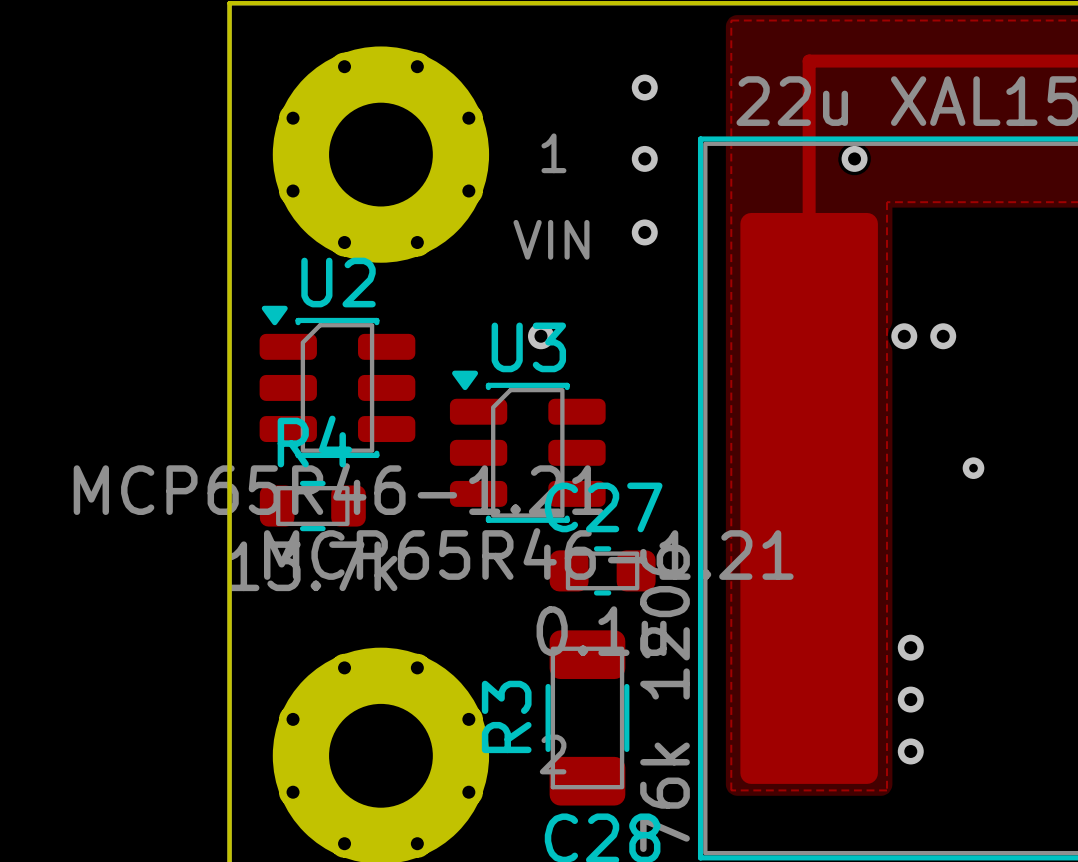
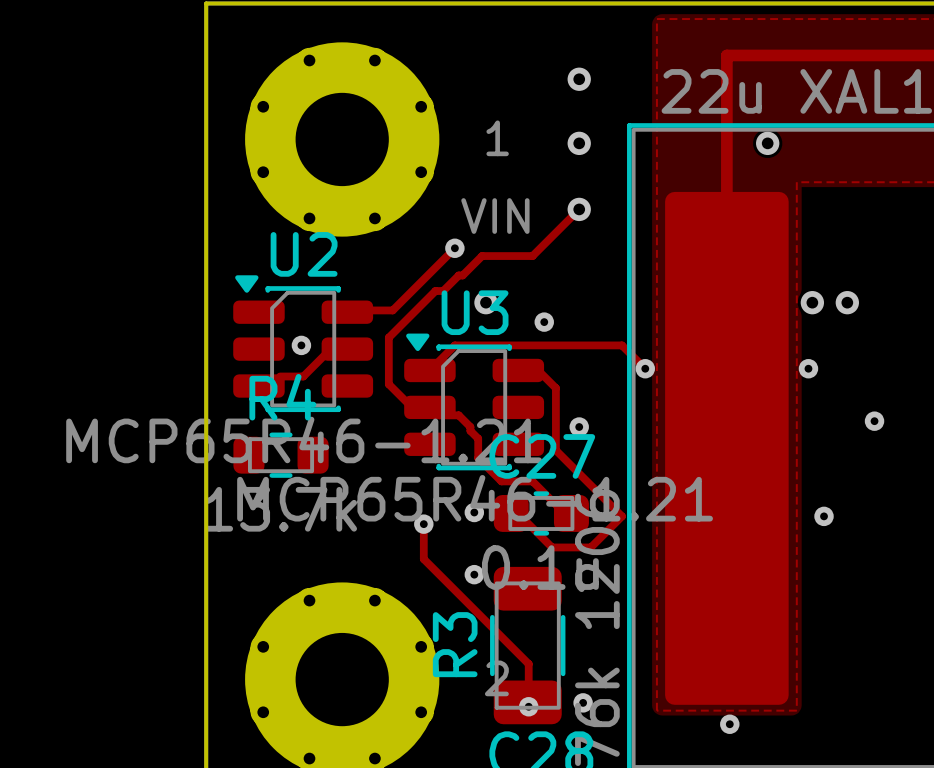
track: none -> (579, 209) (532, 256) (482, 256) (443, 291) (435, 291) (388, 337) (388, 384) (412, 407) (431, 407)
track: none -> (454, 248) (392, 310) (346, 310)
via: none -> (454, 248)
via: none -> (544, 322)
via: none -> (301, 345)
track: none -> (330, 349) (303, 376) (280, 376)
track: none -> (431, 368) (454, 345) (621, 345) (645, 368)
track: none -> (536, 368) (555, 388) (555, 450) (621, 516) (590, 547) (552, 547) (517, 512)
via: none -> (645, 368)
via: none -> (808, 368)
track: none -> (431, 407) (439, 415) (458, 415) (470, 427) (470, 430) (478, 438) (478, 458) (501, 481) (532, 481) (563, 512) (571, 513)
via: none -> (579, 427)
via: none -> (474, 512)
via: none -> (824, 516)
track: none -> (423, 524) (423, 559) (528, 664) (528, 706)
via: none -> (423, 524)
via: none -> (474, 574)
via: (910, 647) -> none
via: (910, 699) -> none
via: (910, 751) -> none
via: none -> (583, 702)
via: none -> (528, 706)
via: none -> (729, 724)

